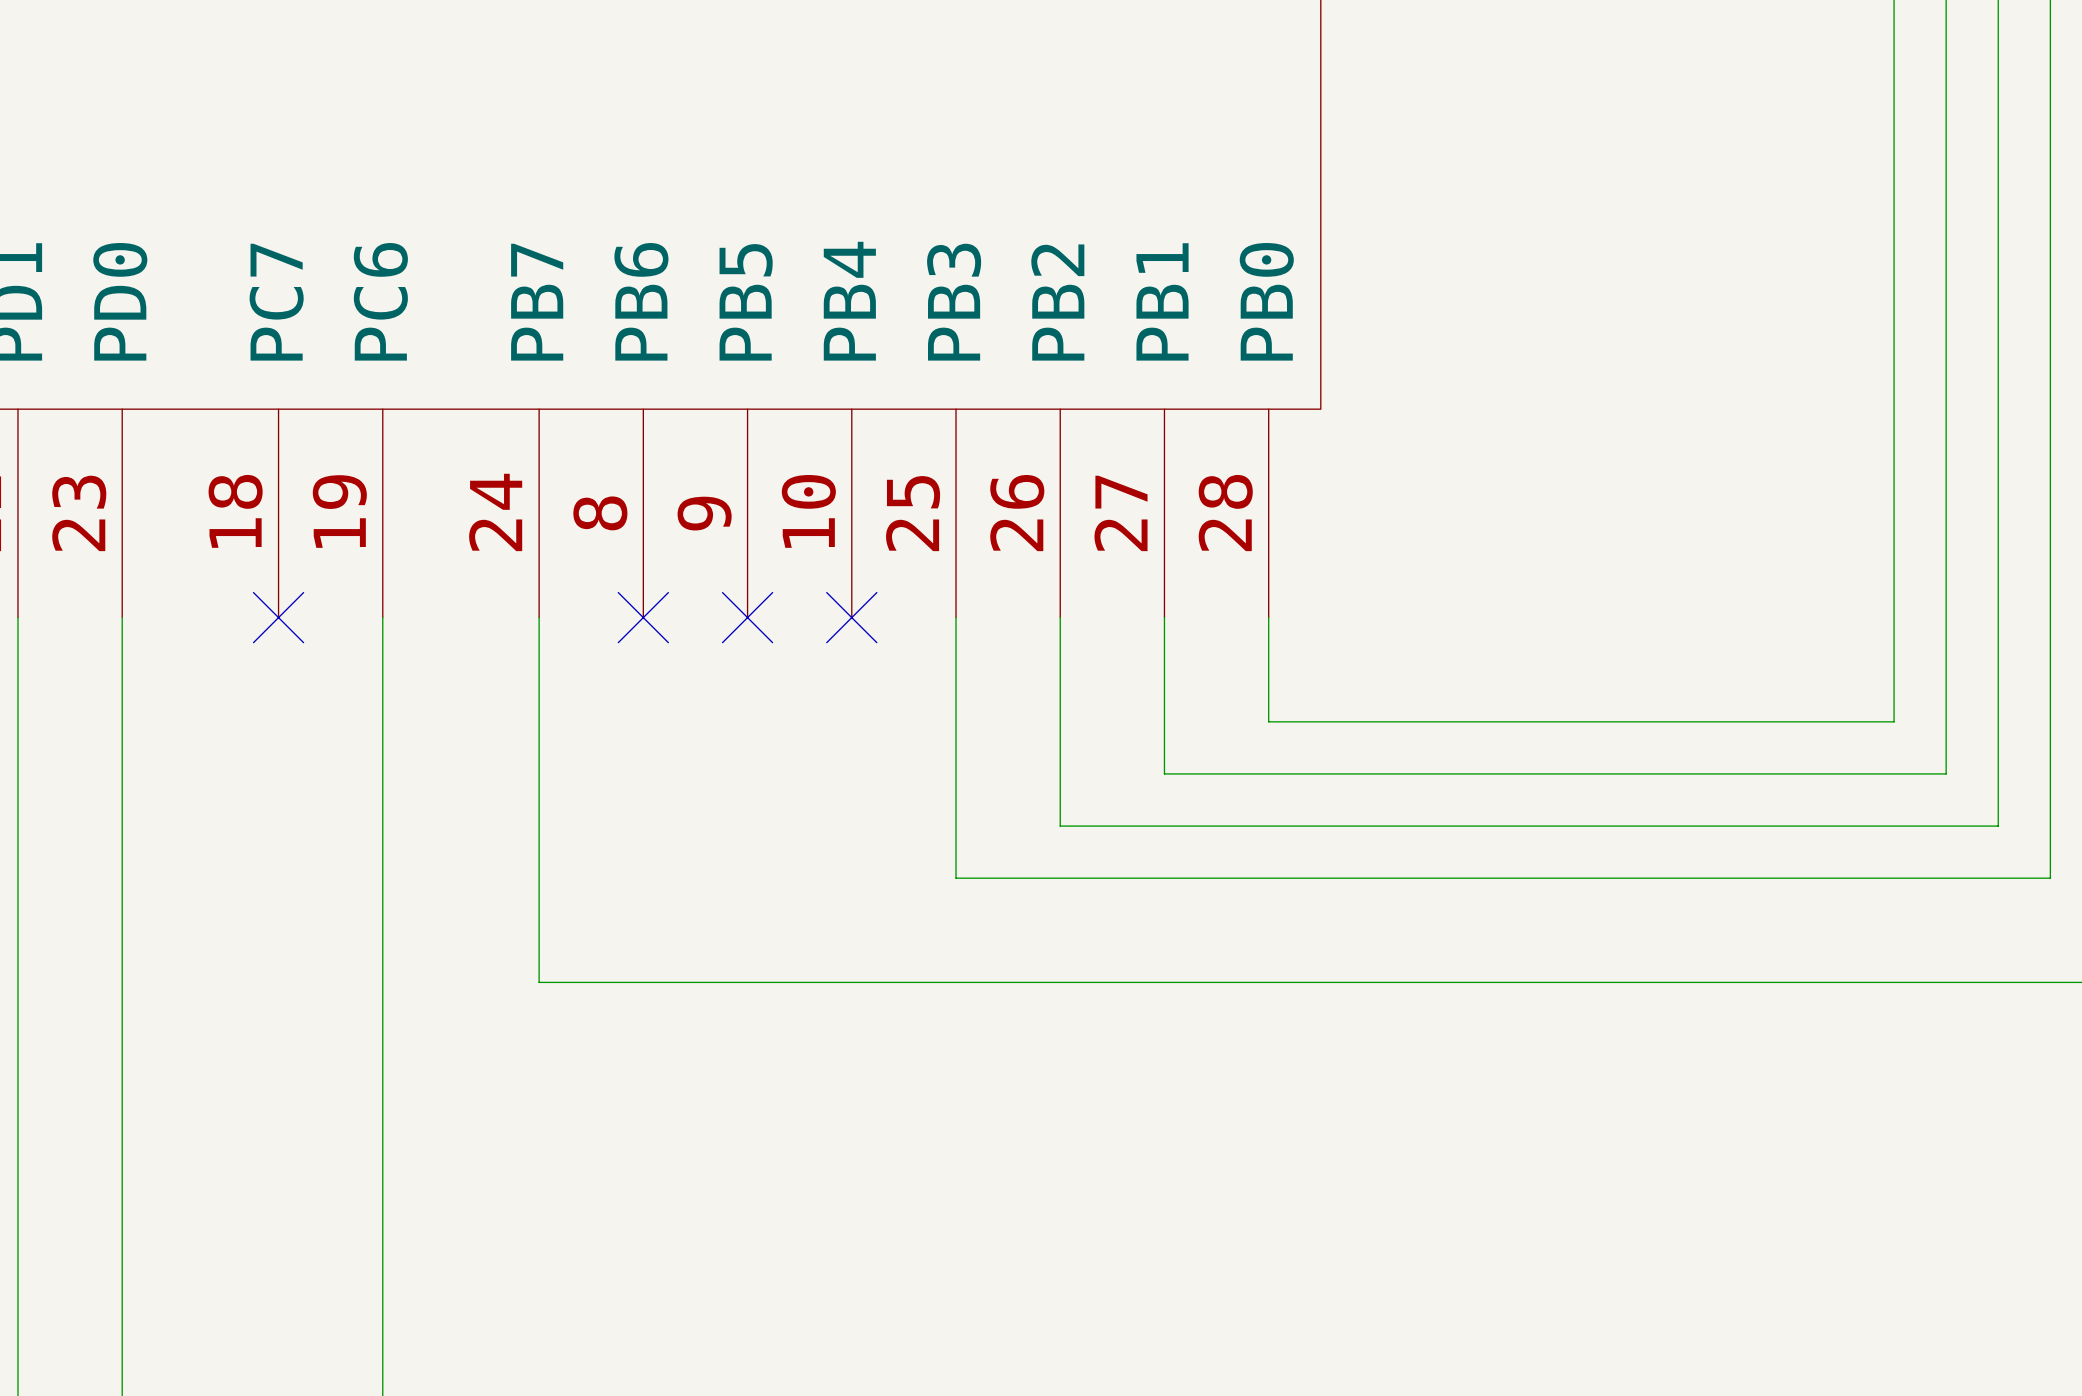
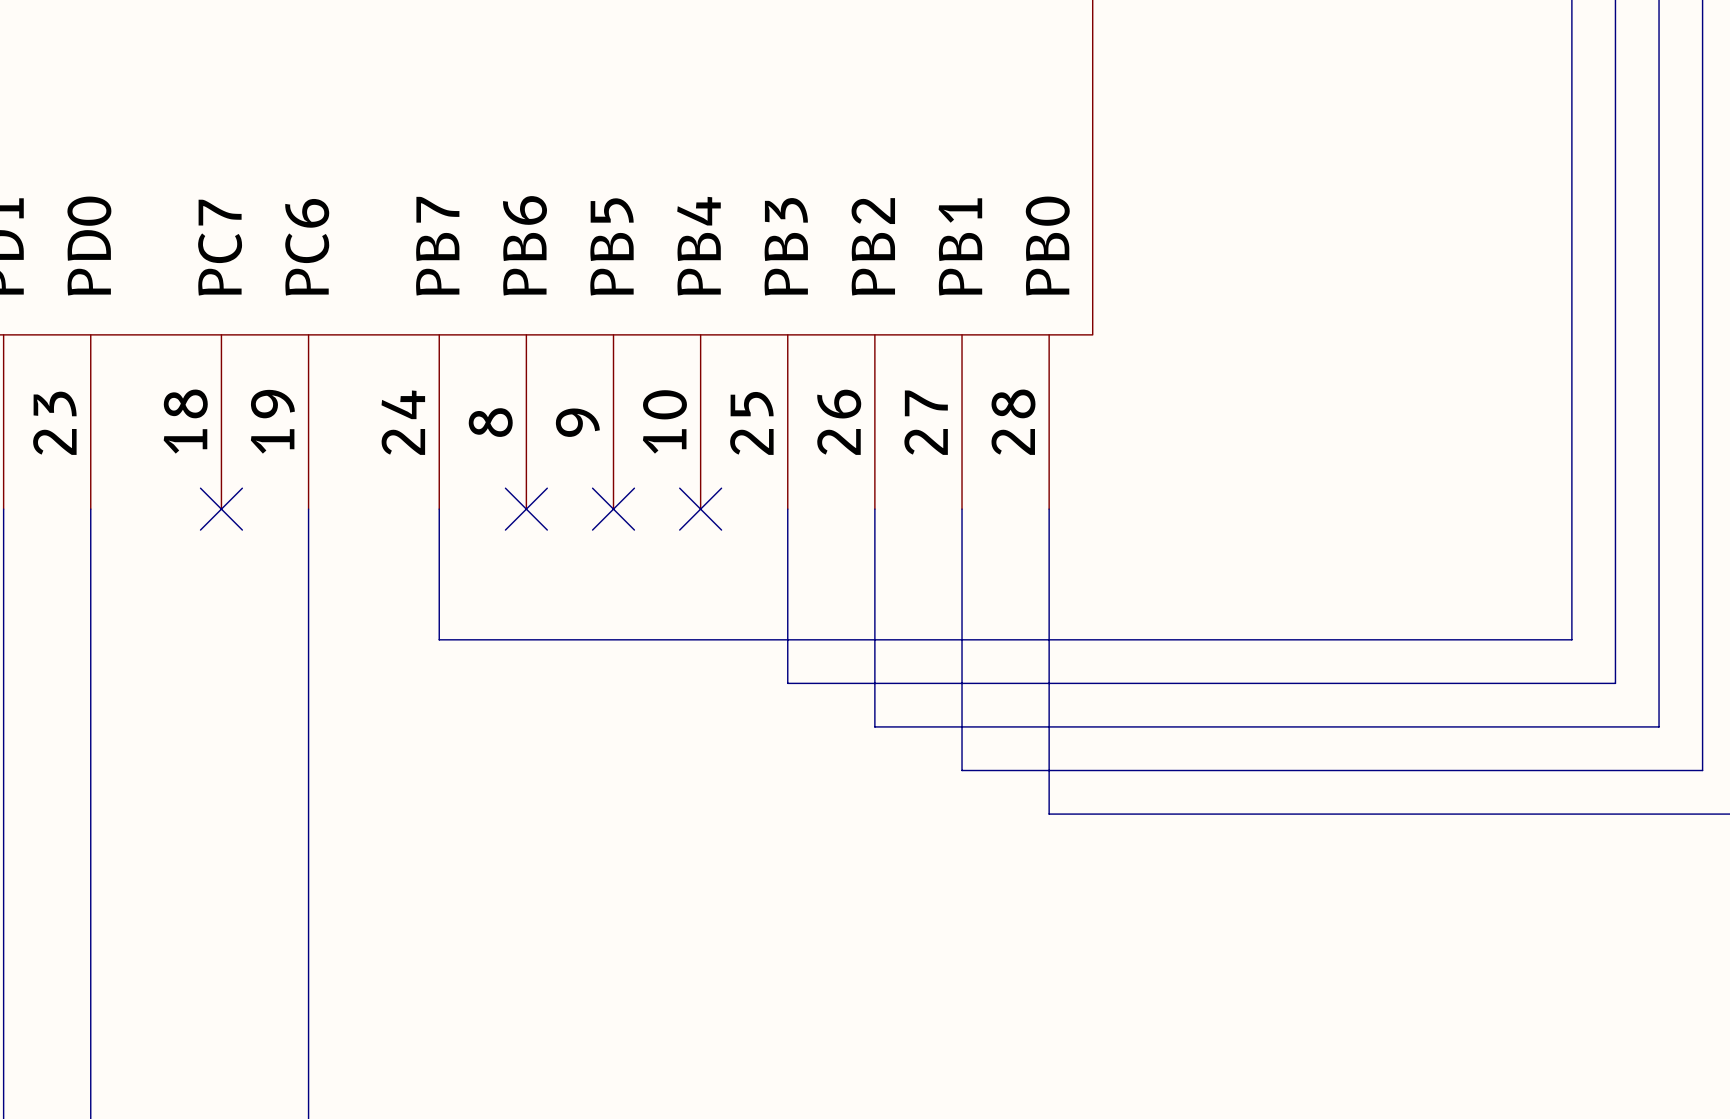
wire: (1268, 721) (1894, 721) -> (1049, 596) (1049, 814)
wire: (539, 773) (539, 982) (1268, 982) -> (439, 639) (962, 639) (962, 770) (1702, 770) (1702, 726)
wire: (1894, 773) (1946, 773) -> (1571, 639) (1571, 596)
wire: (956, 826) (956, 878) (1060, 878) -> (787, 683) (874, 683) (874, 726)
wire: (1946, 826) (1998, 826) -> (1615, 683) (1615, 639)
wire: (1998, 878) (2050, 878) -> (1659, 726) (1659, 683)

